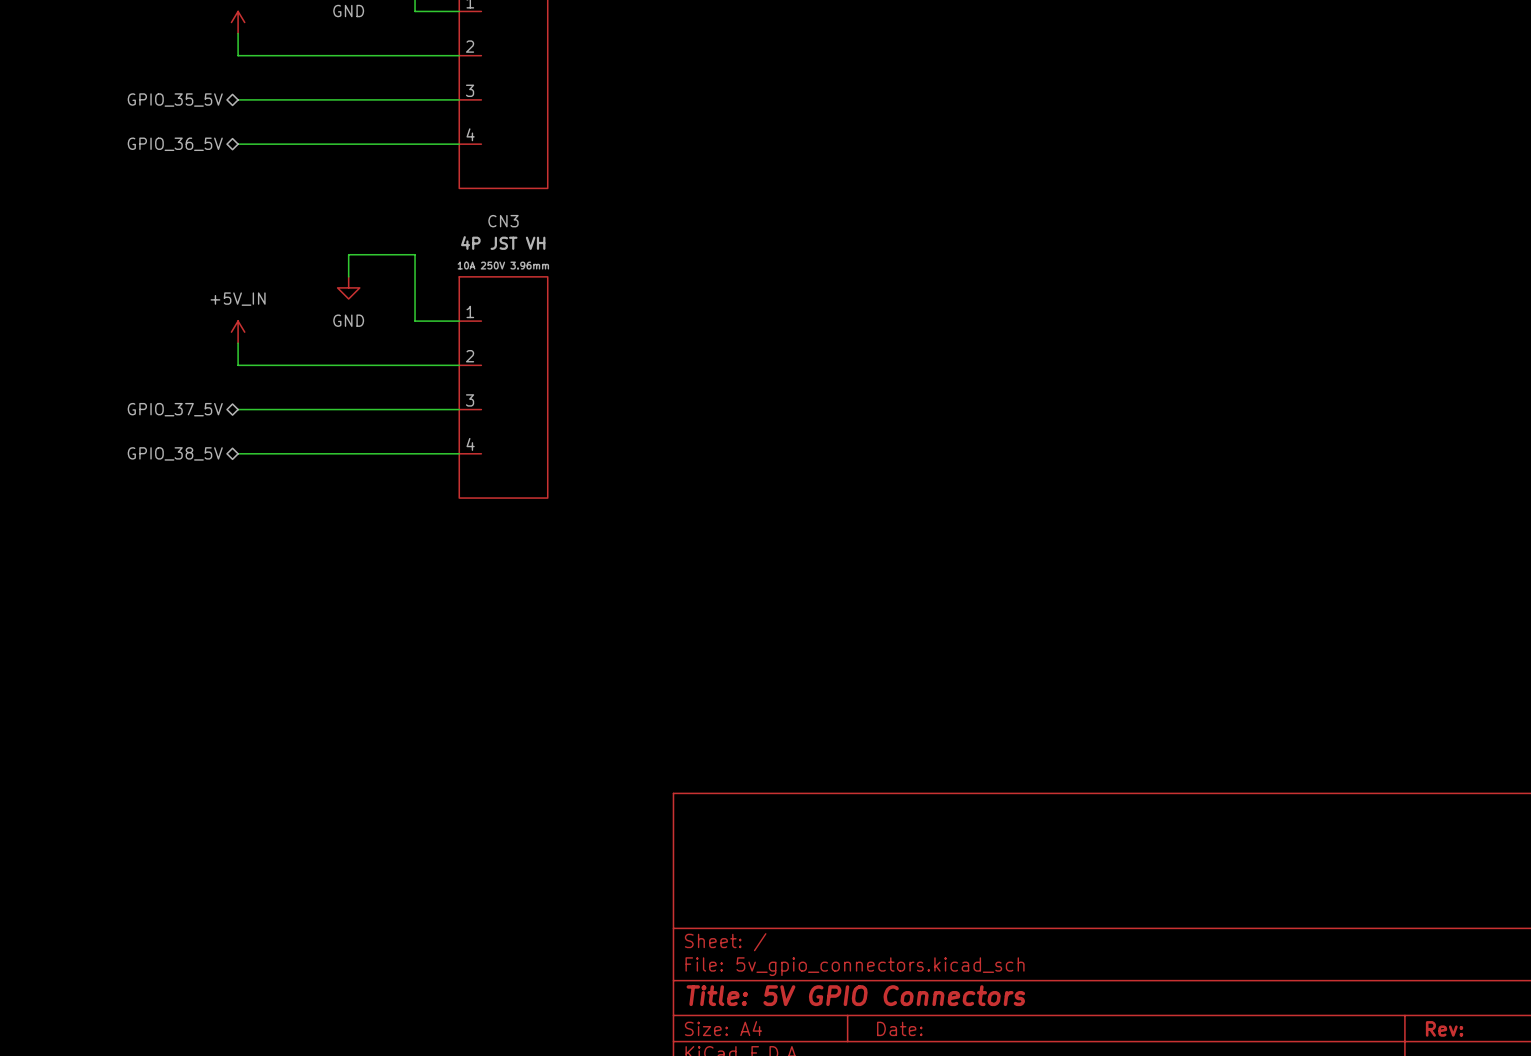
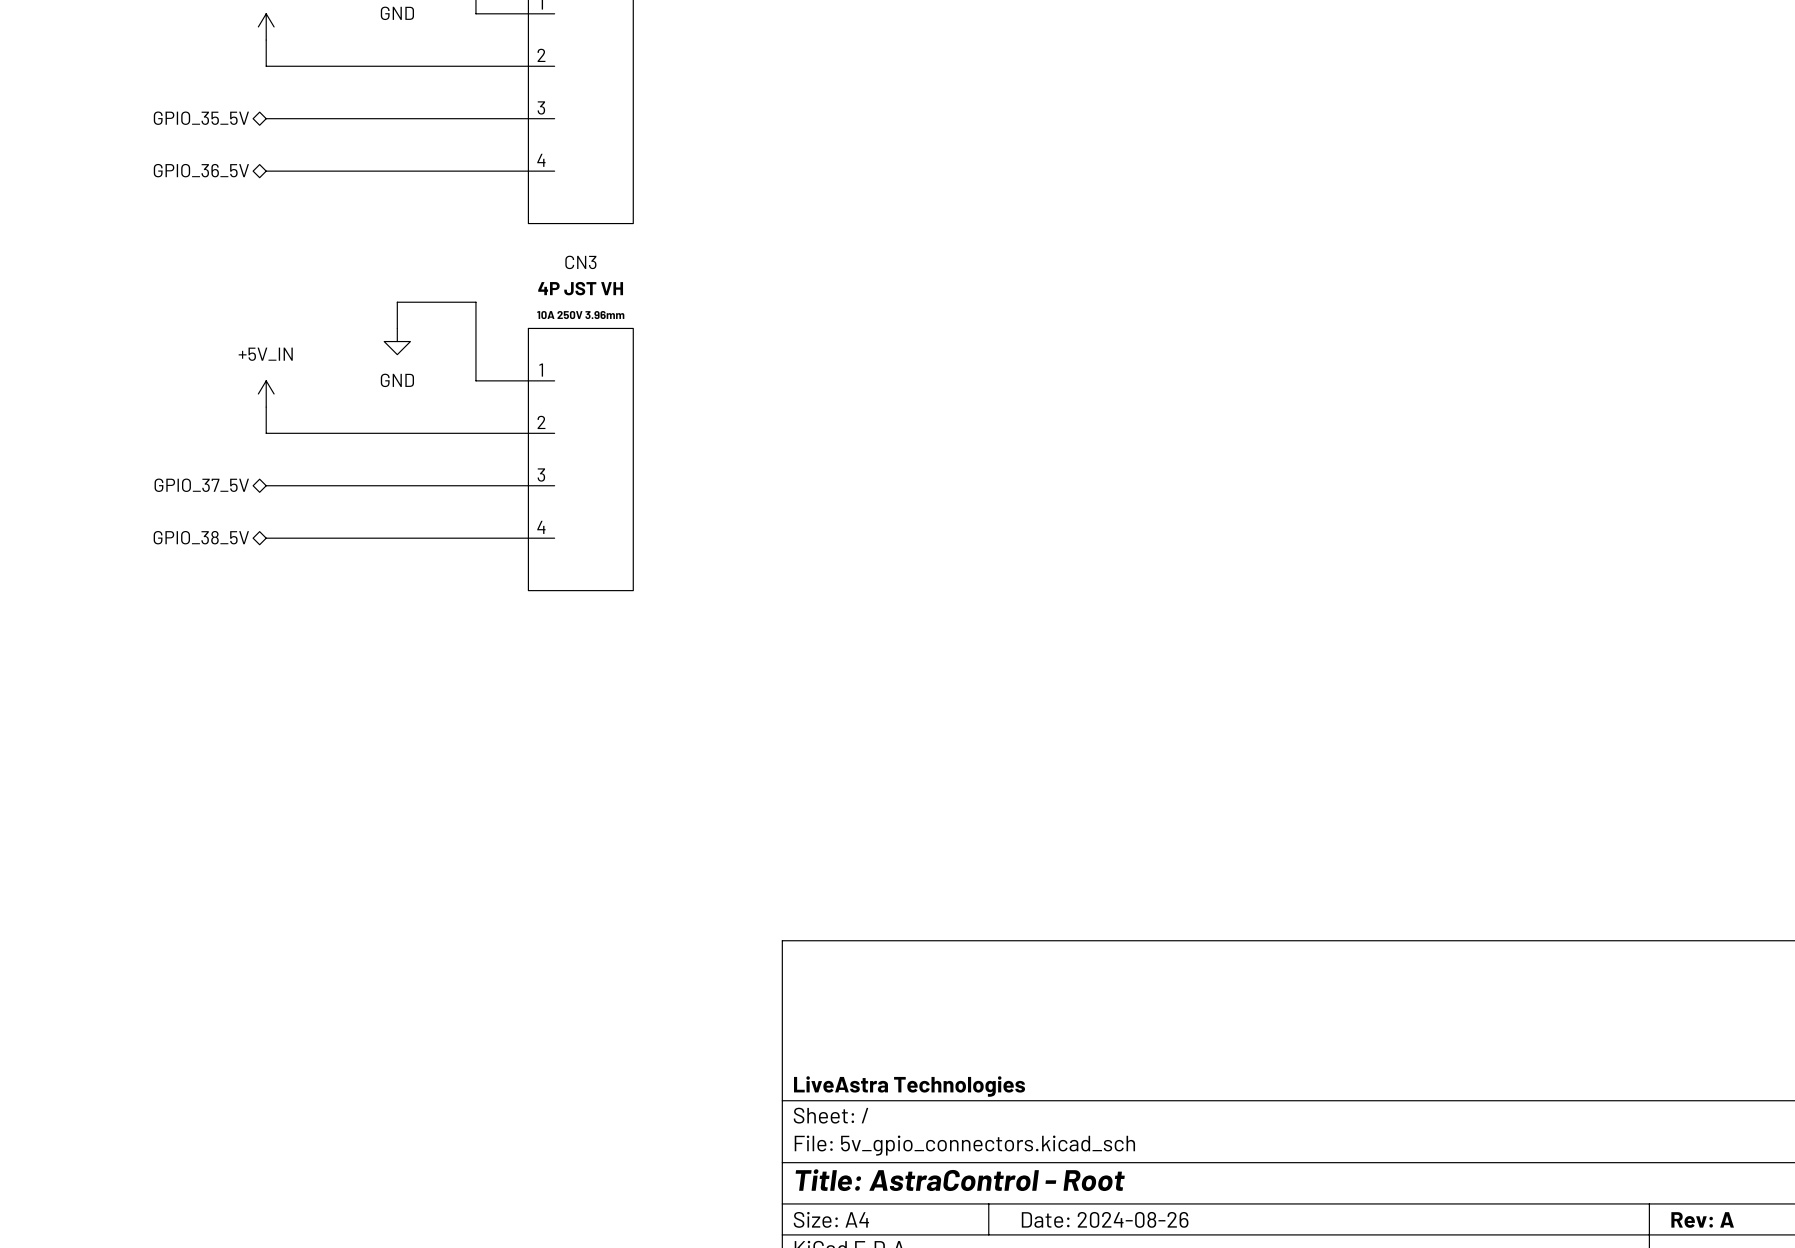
title block: none -> LiveAstra Technologies (909, 1086)
title block: Title: 5V GPIO Connectors (855, 995) -> Title: AstraControl - Root (960, 1180)
title block: Date: (899, 1028) -> Date: 2024-08-26 (1105, 1219)
title block: Rev: (1444, 1028) -> Rev: A (1702, 1219)

